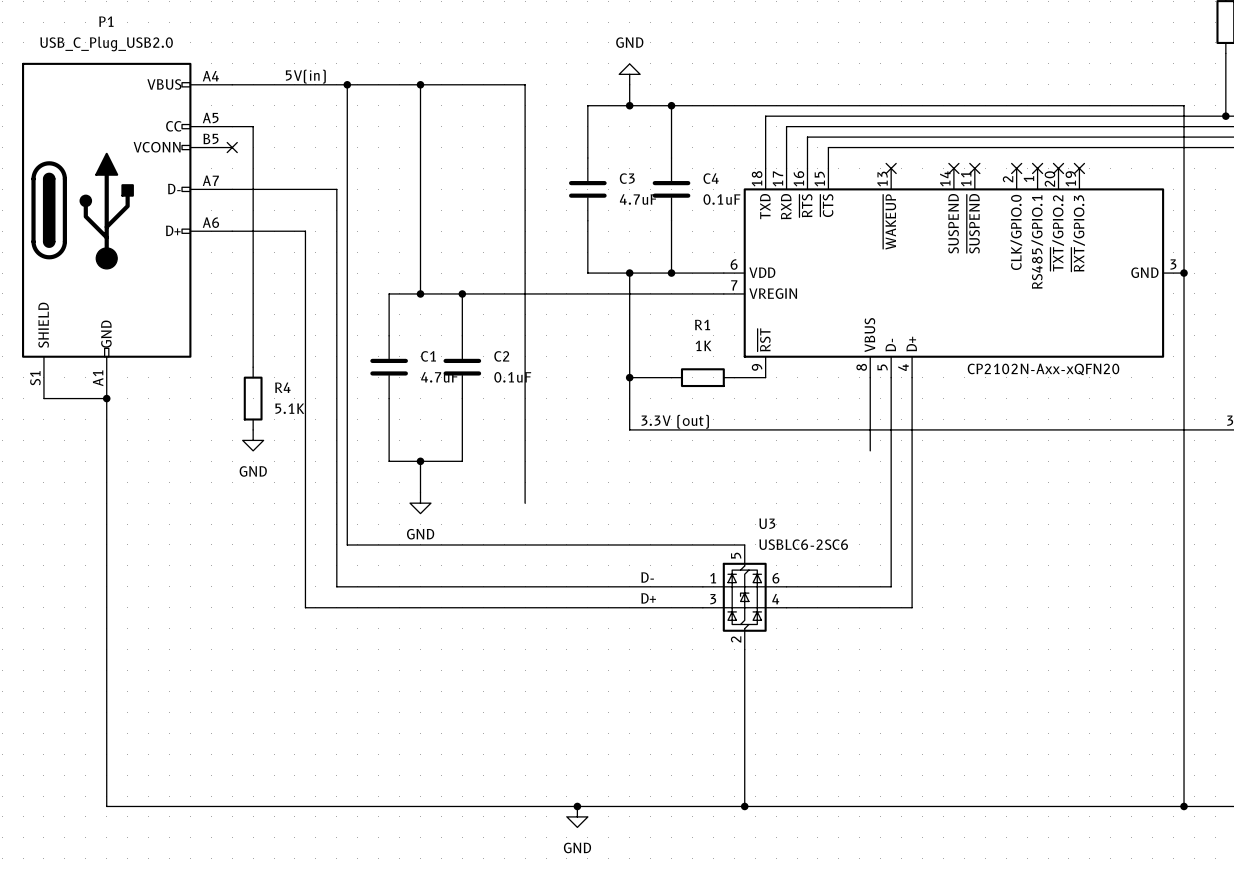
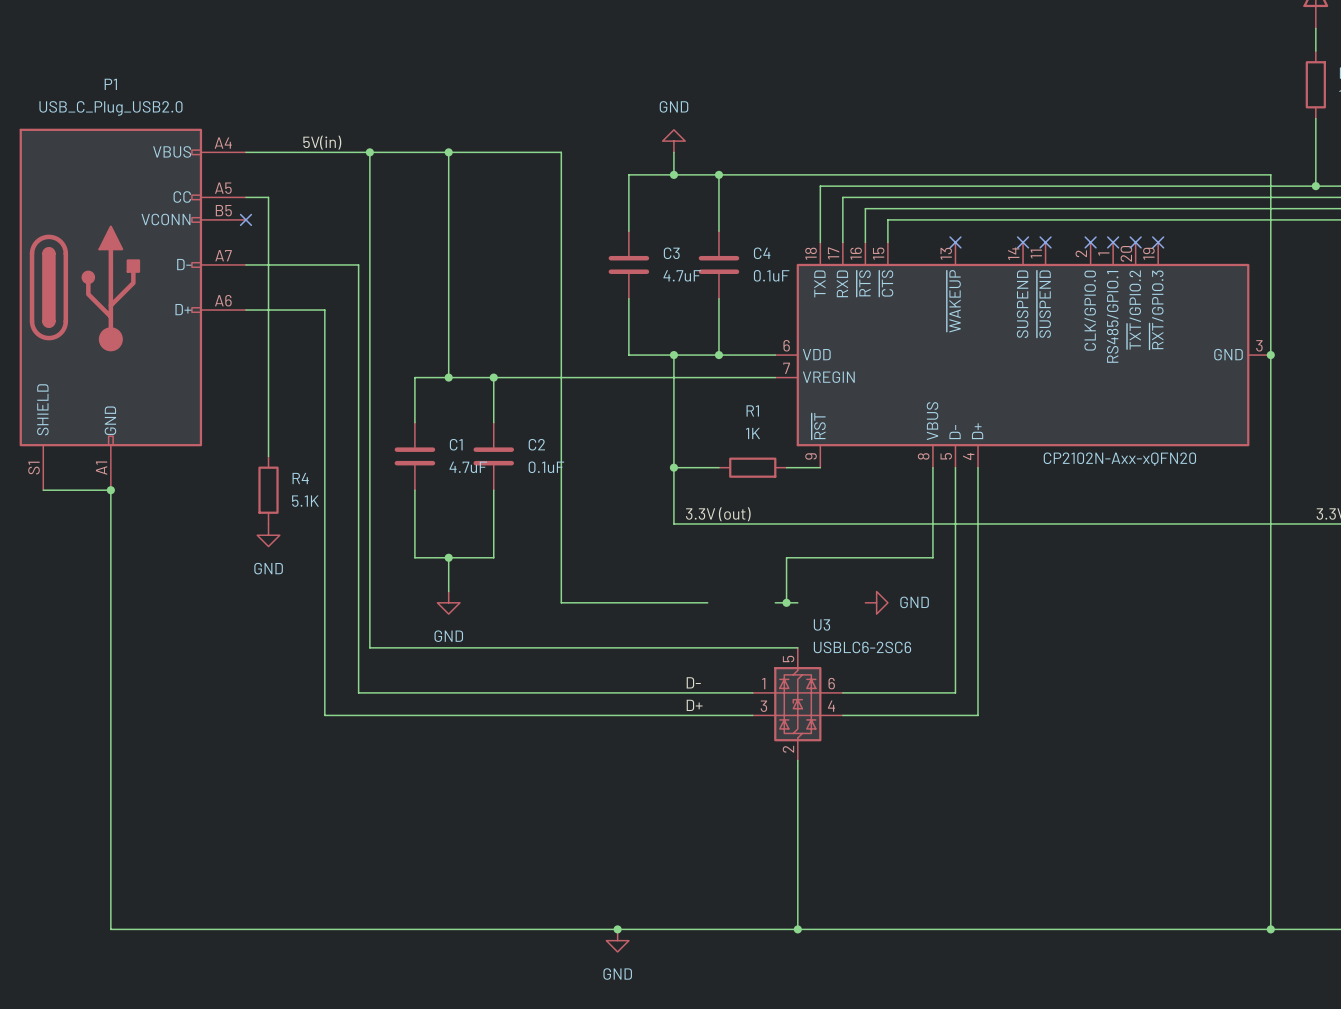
wire: none -> (932, 546) (932, 557) (786, 557) (786, 602)
wire: none -> (561, 602) (707, 602)
wire: none -> (775, 602) (797, 602)
junction: none -> (786, 602)
power symbol: none -> GND (876, 602)

